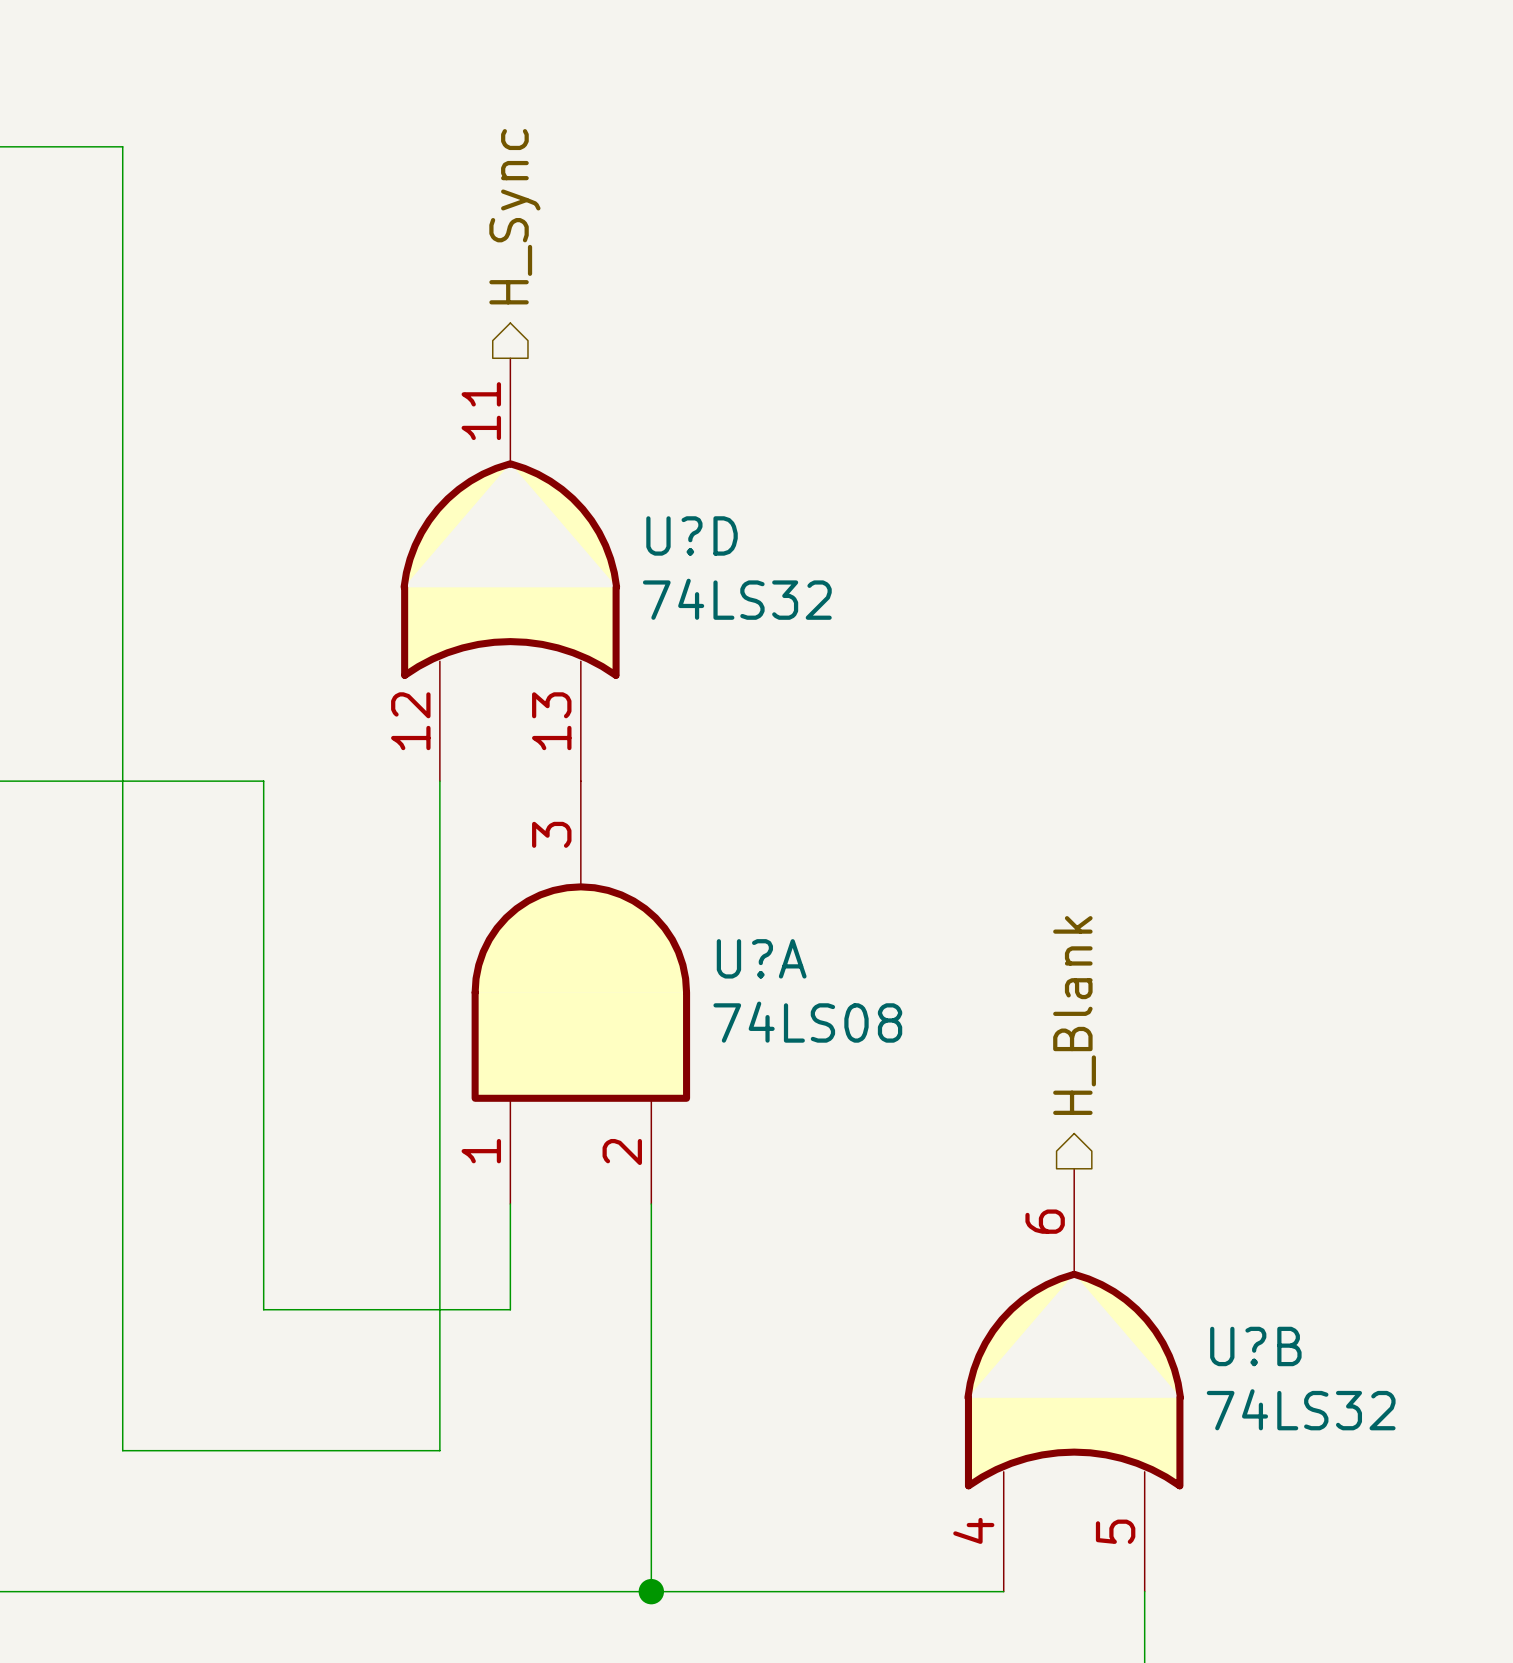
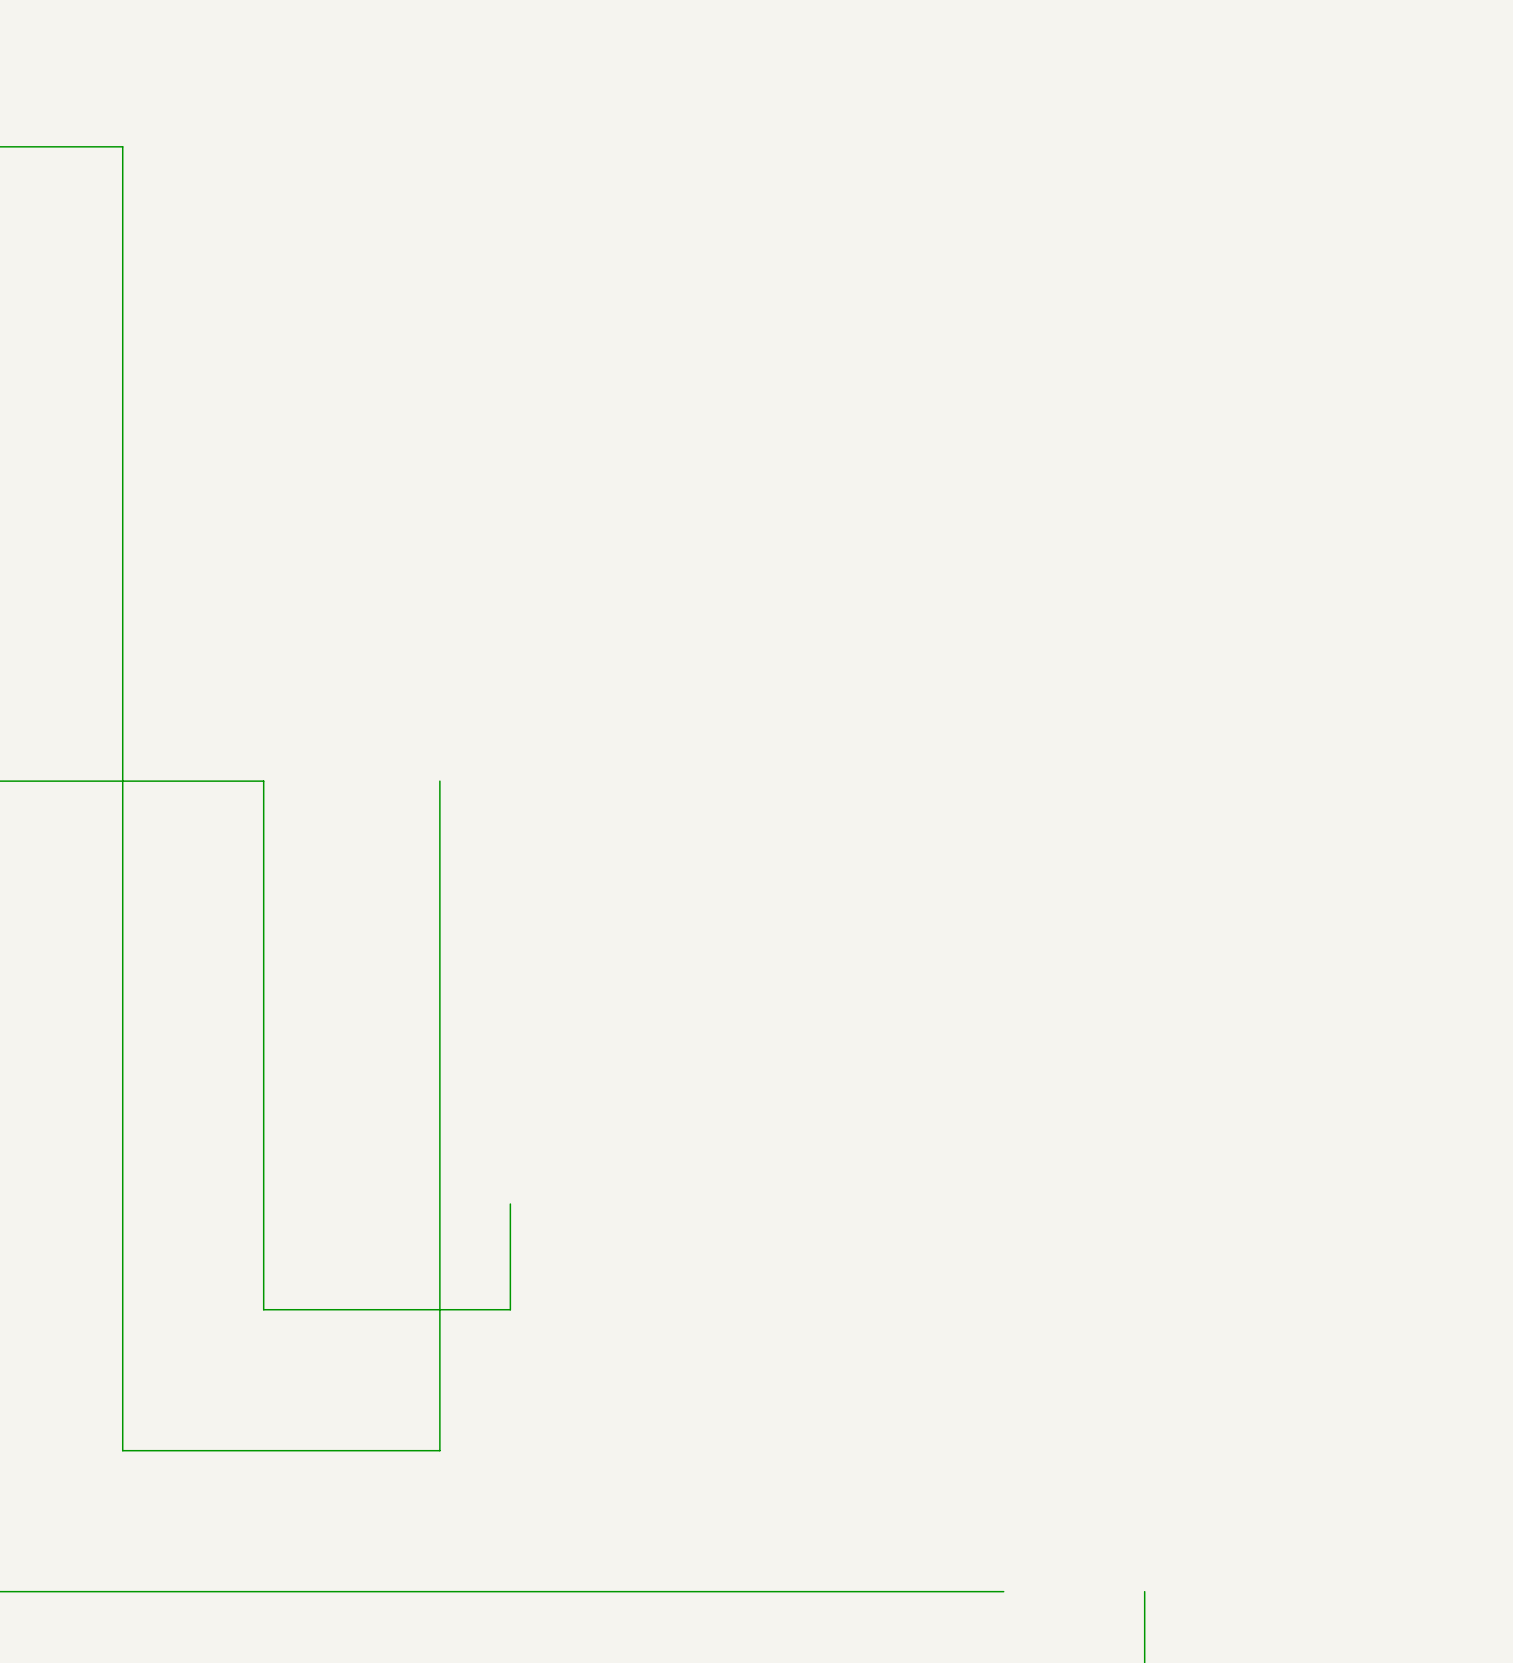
hierarchical label: H_Sync (514, 216) -> none
U?D: 74LS32 (510, 569) -> none
U?A: 74LS08 (580, 992) -> none
hierarchical label: H_Blank (1074, 1015) -> none
wire: (651, 1204) (651, 1591) -> none
U?B: 74LS32 (1074, 1380) -> none
junction: (651, 1591) -> none

